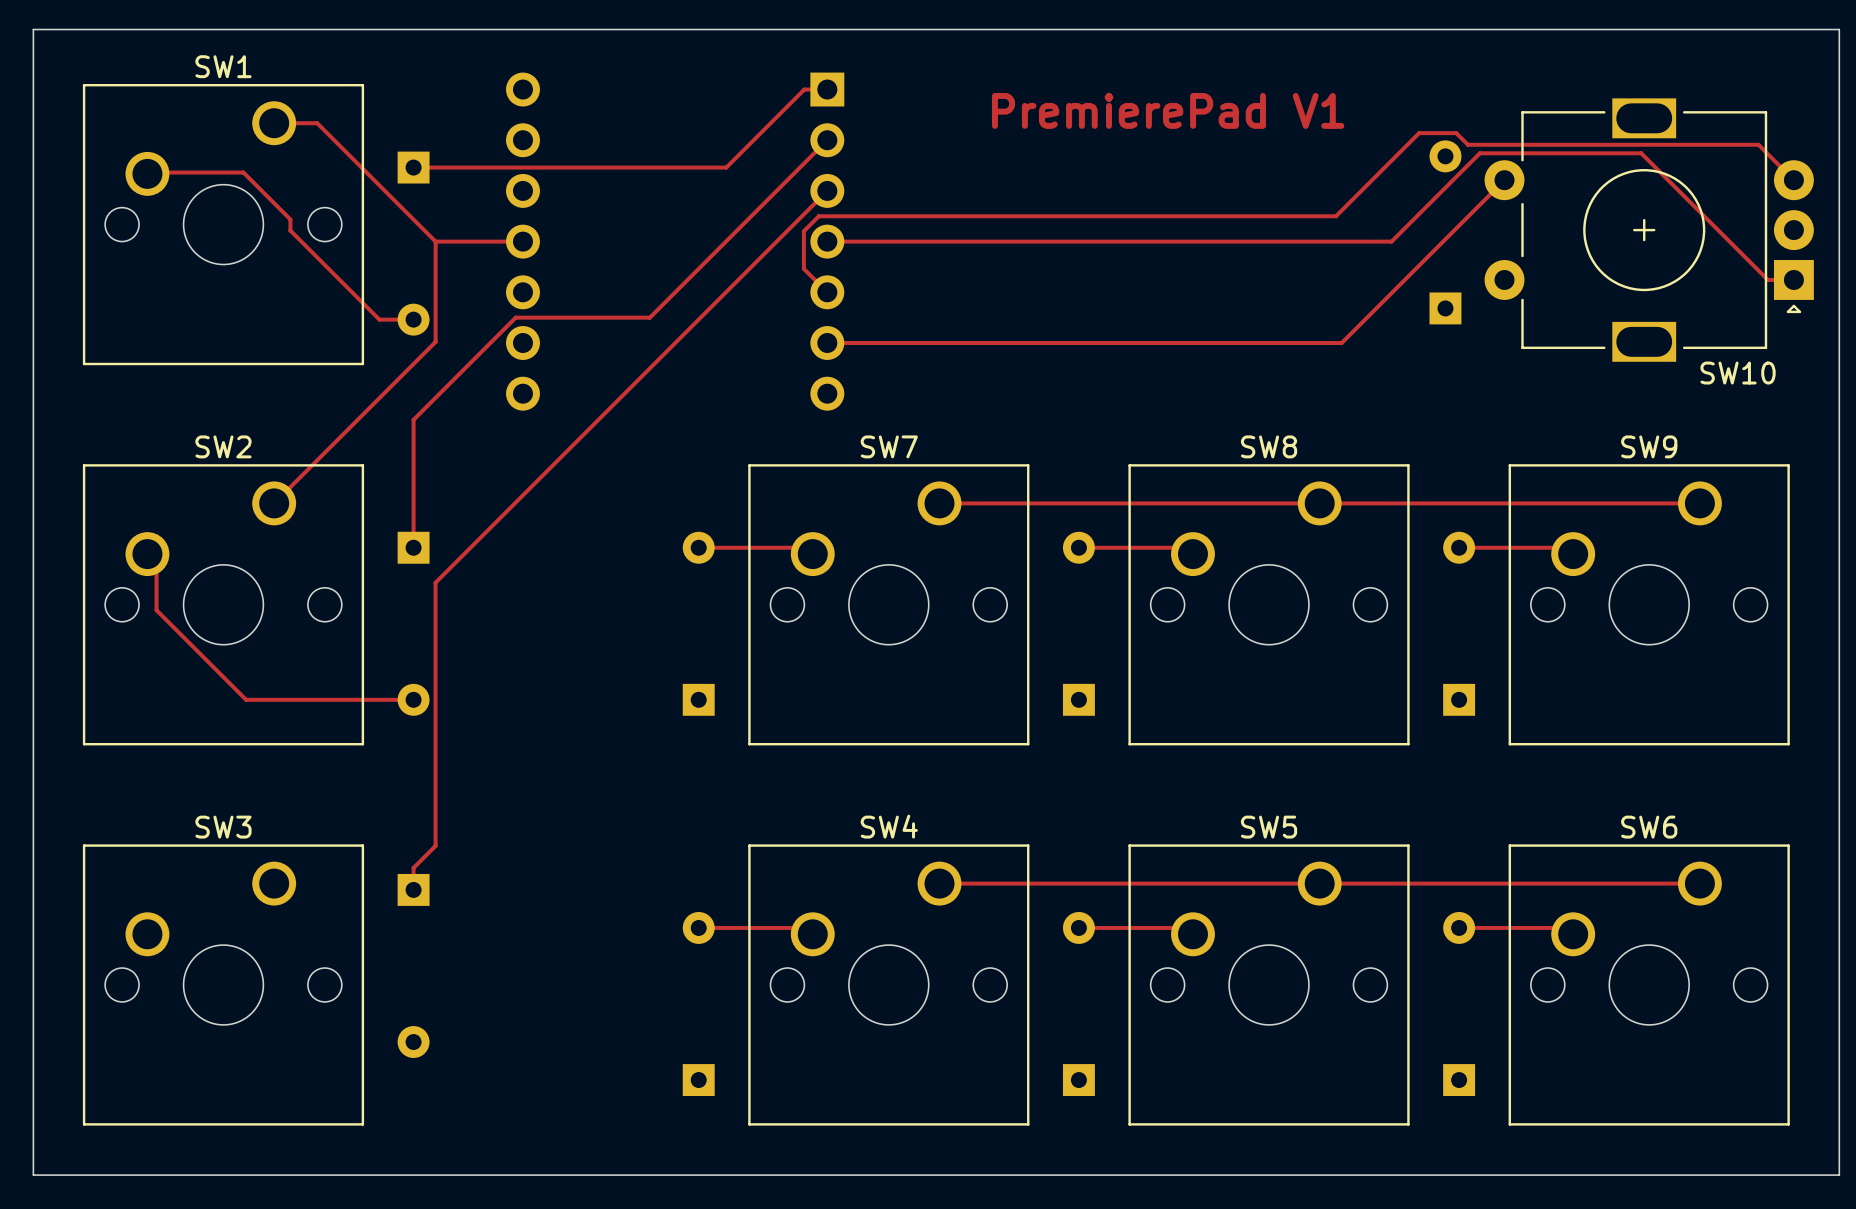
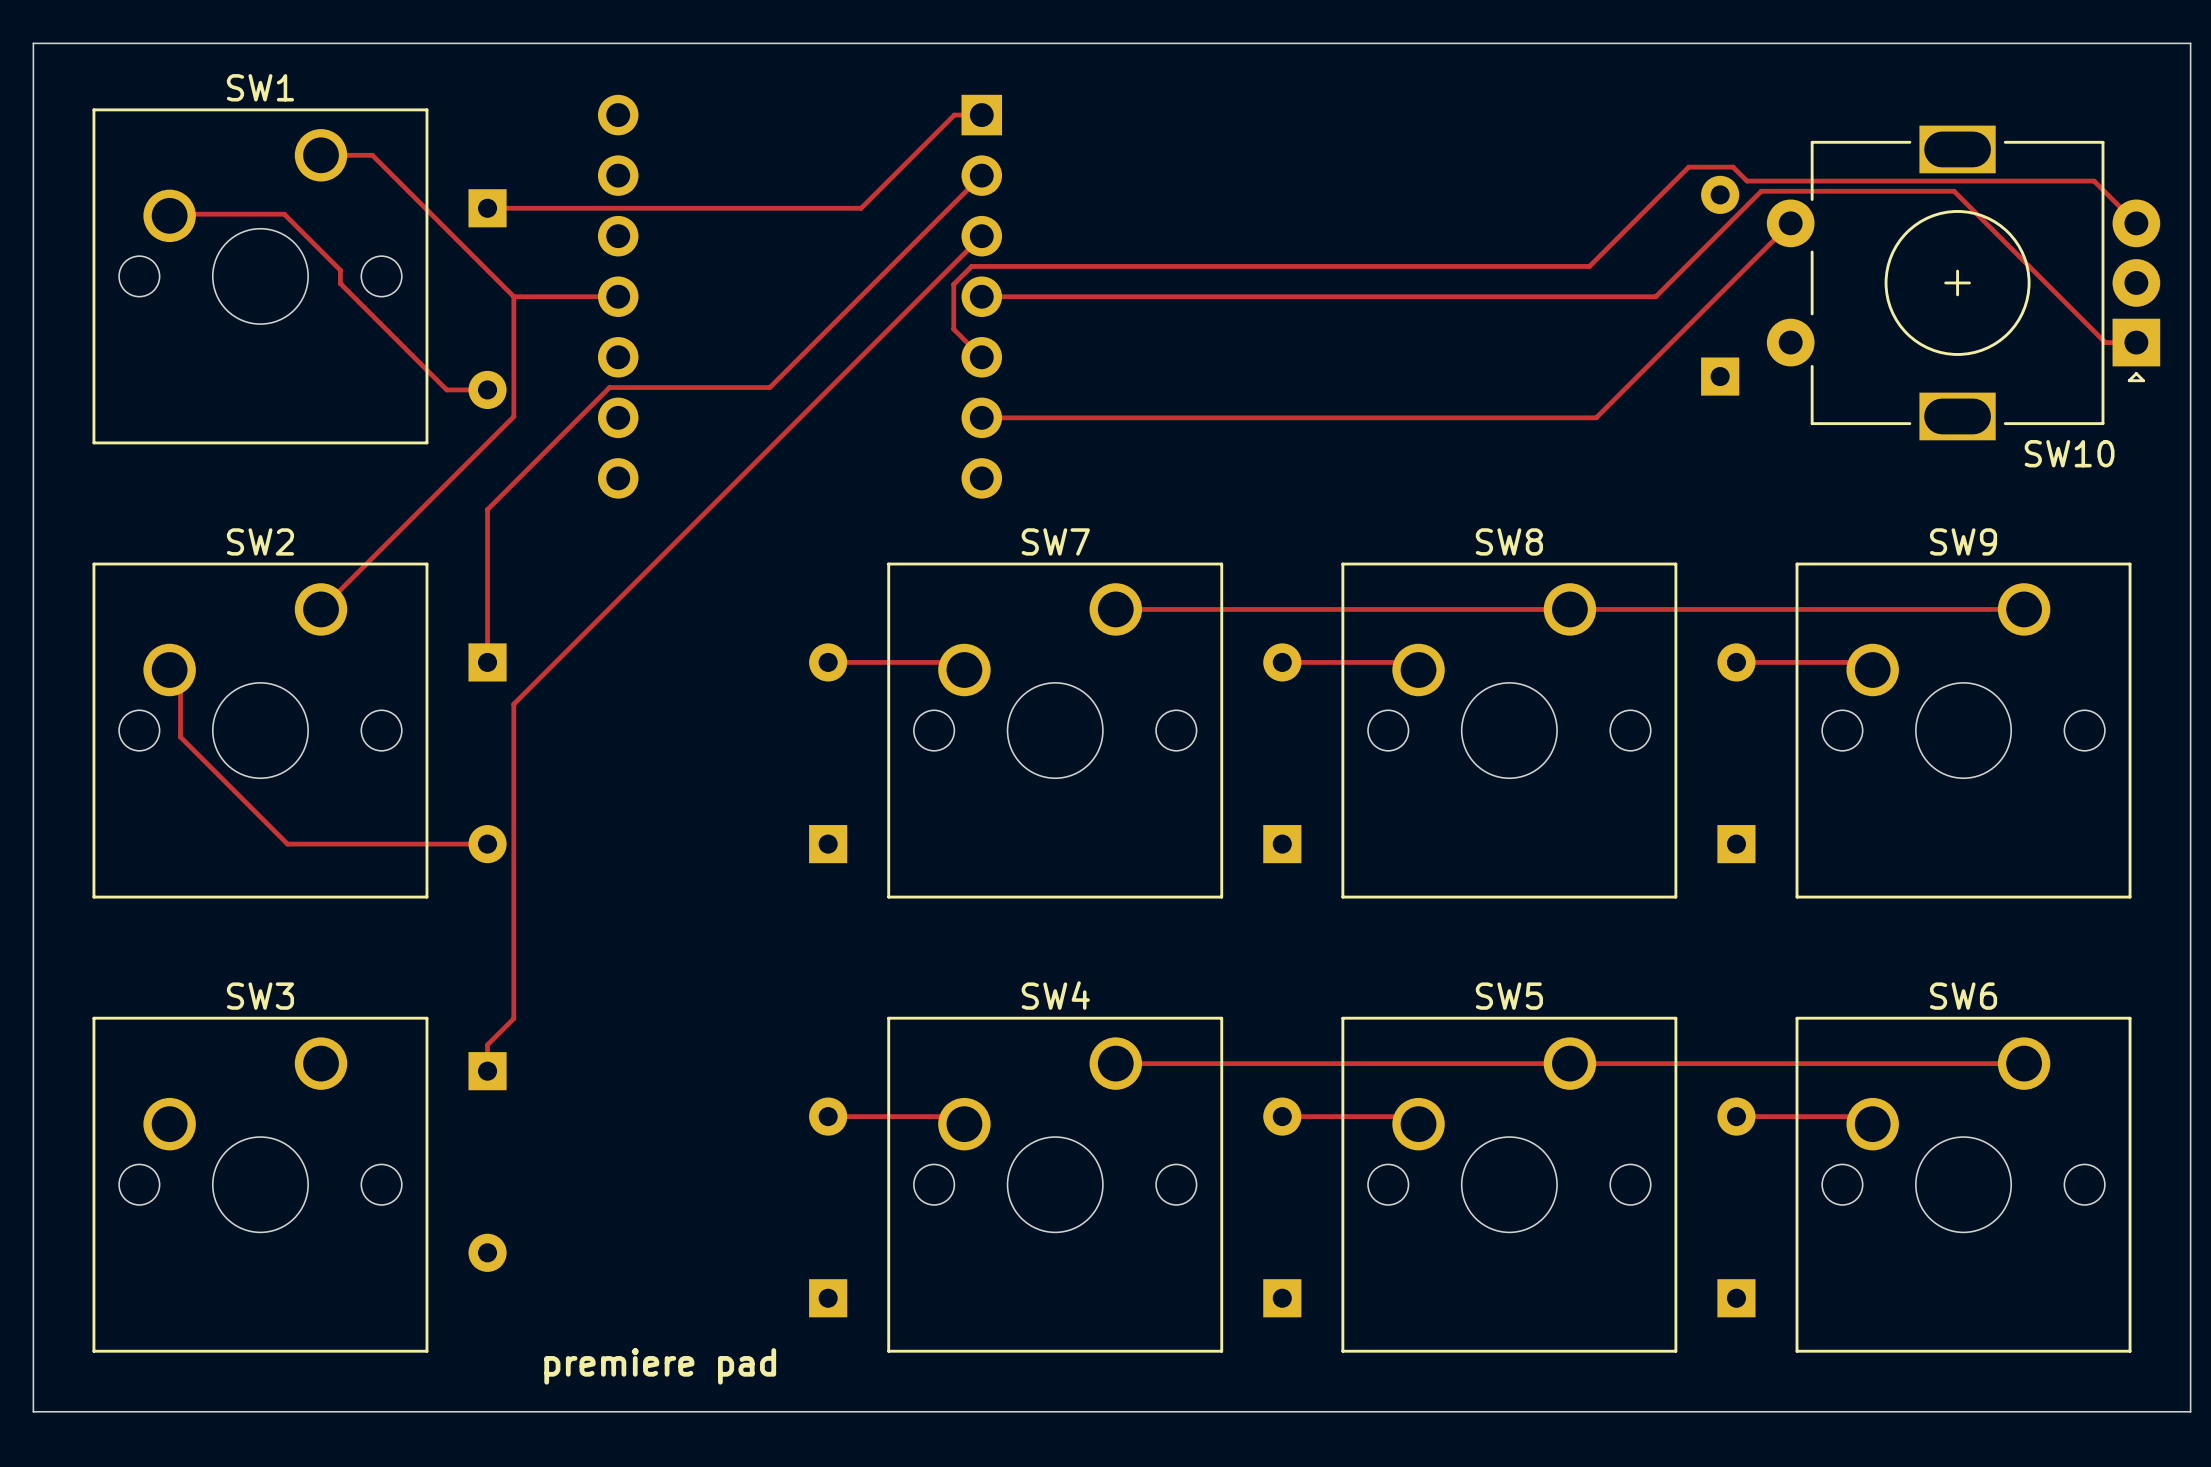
text: PremierePad V1 (1168, 110) -> none
text: none -> premiere pad (660, 1366)

